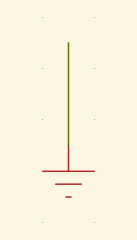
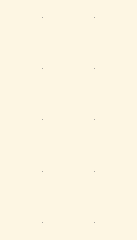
wire: (68, 42) (68, 145) -> none
power symbol: (68, 171) -> none

